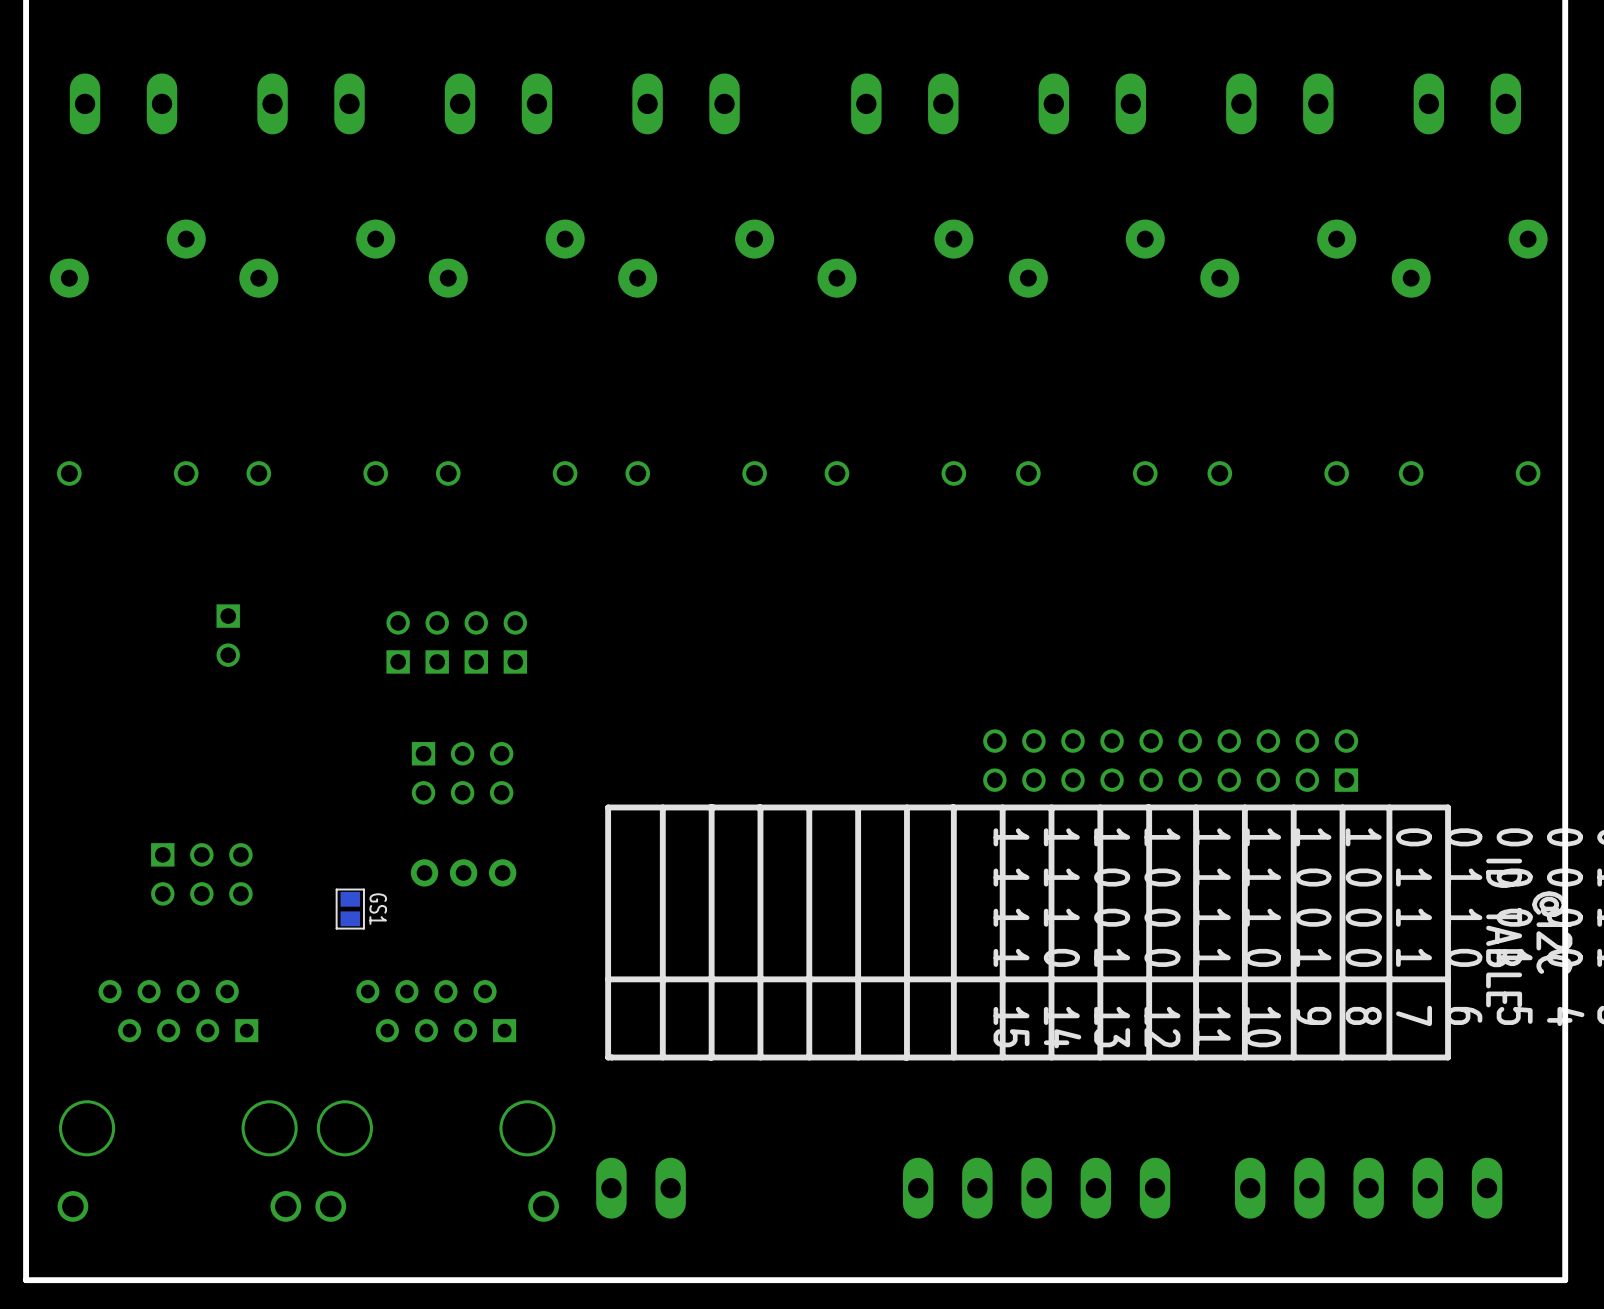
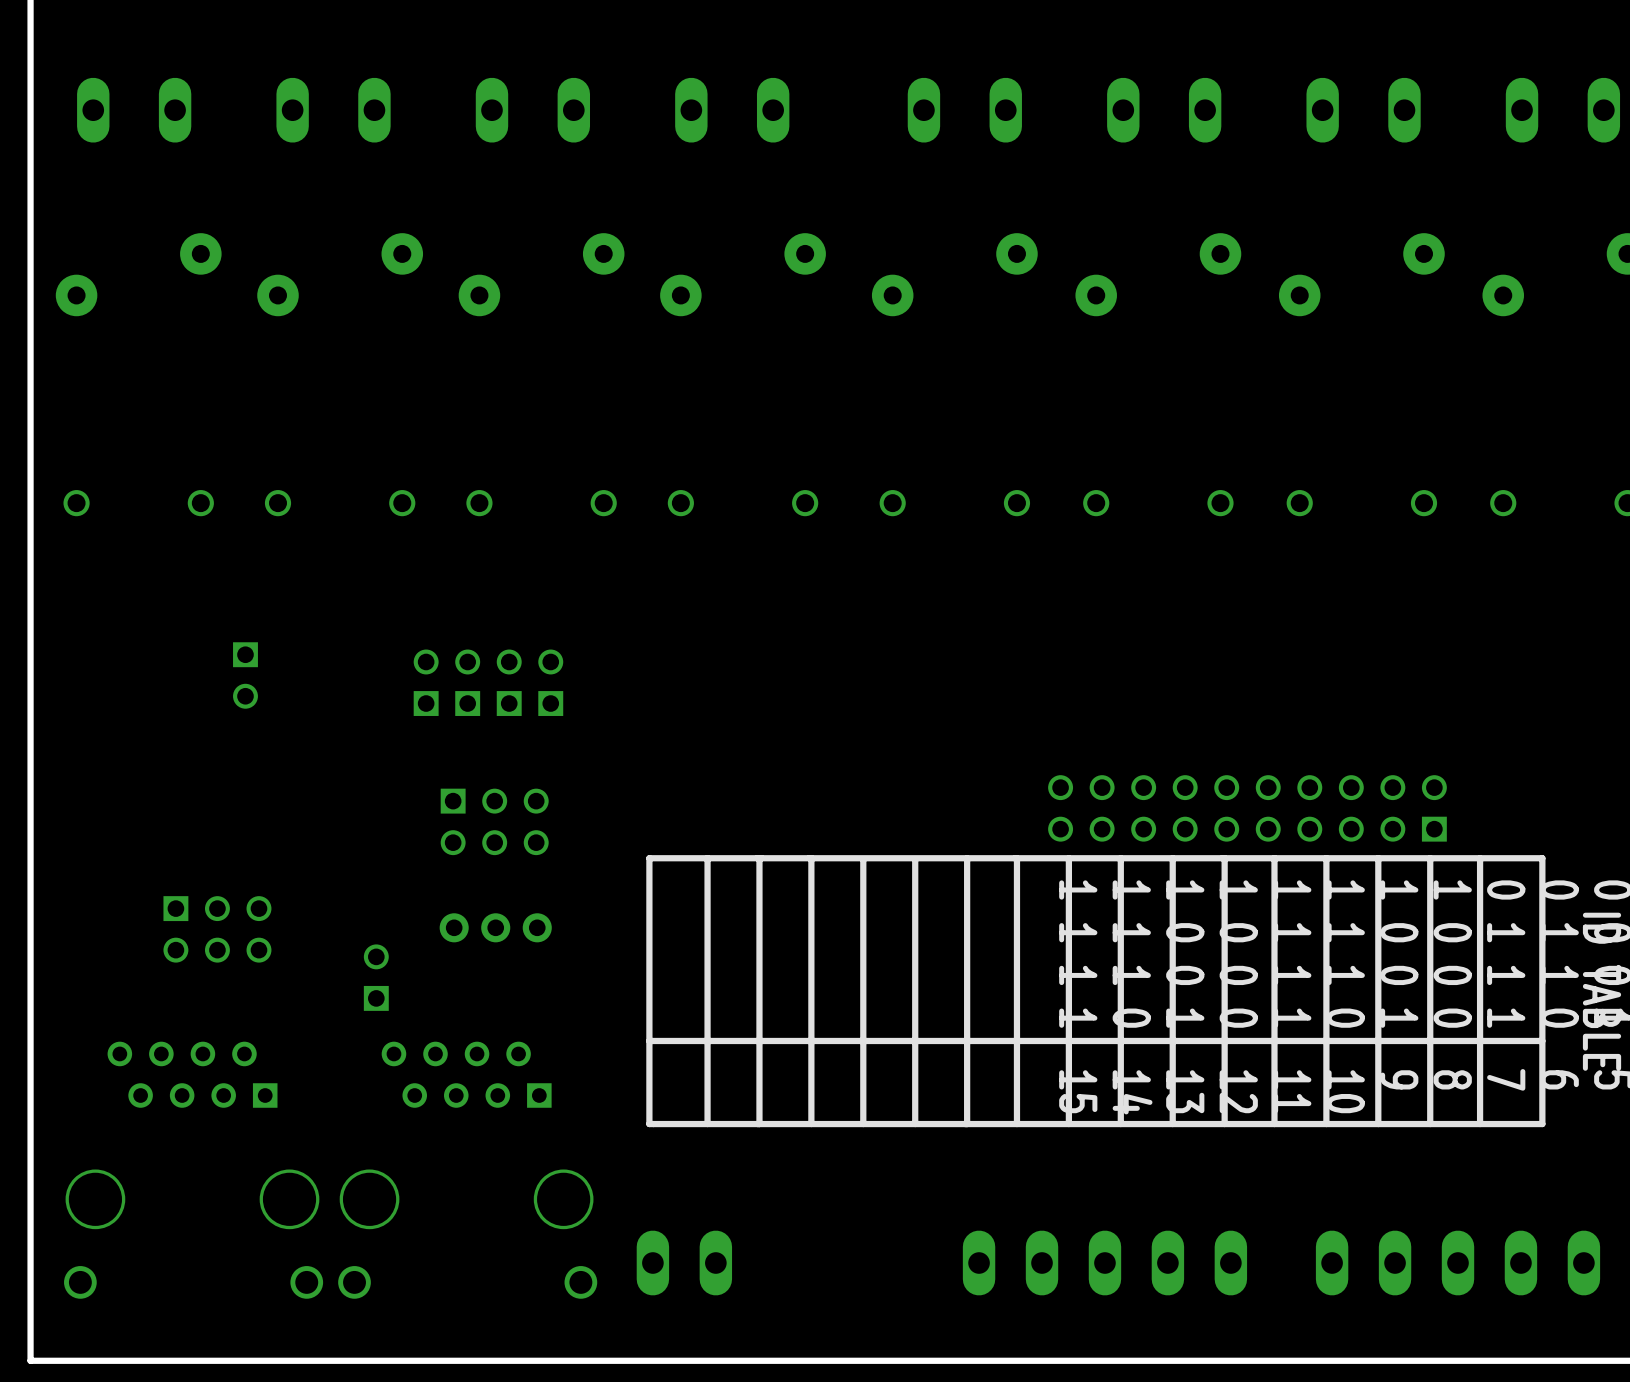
GS1: (350, 909) -> none
part: none -> (376, 977)

